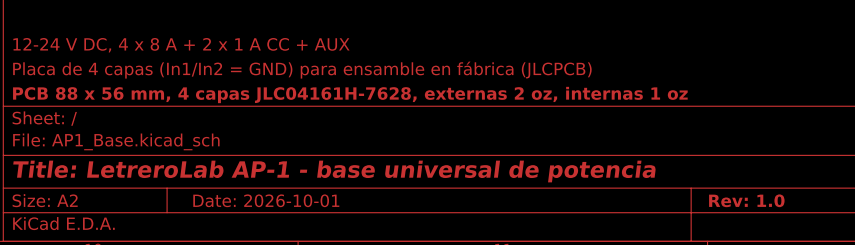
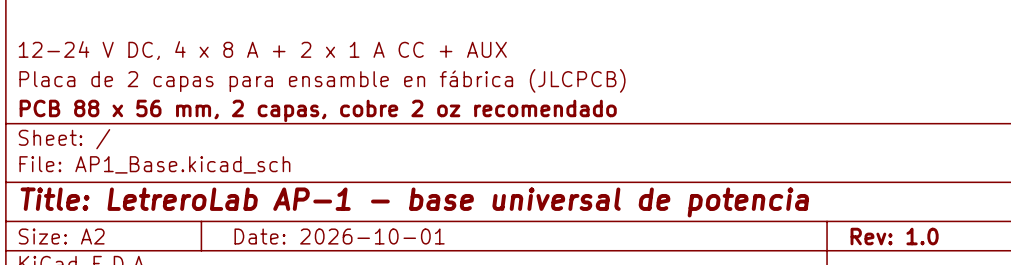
title block: Placa de 4 capas (In1/In2 = GND) para ensamble en fábrica (JLCPCB) (302, 70) -> Placa de 2 capas para ensamble en fábrica (JLCPCB) (322, 80)
title block: PCB 88 x 56 mm, 4 capas JLC04161H-7628, externas 2 oz, internas 1 oz (350, 95) -> PCB 88 x 56 mm, 2 capas, cobre 2 oz recomendado (318, 110)

